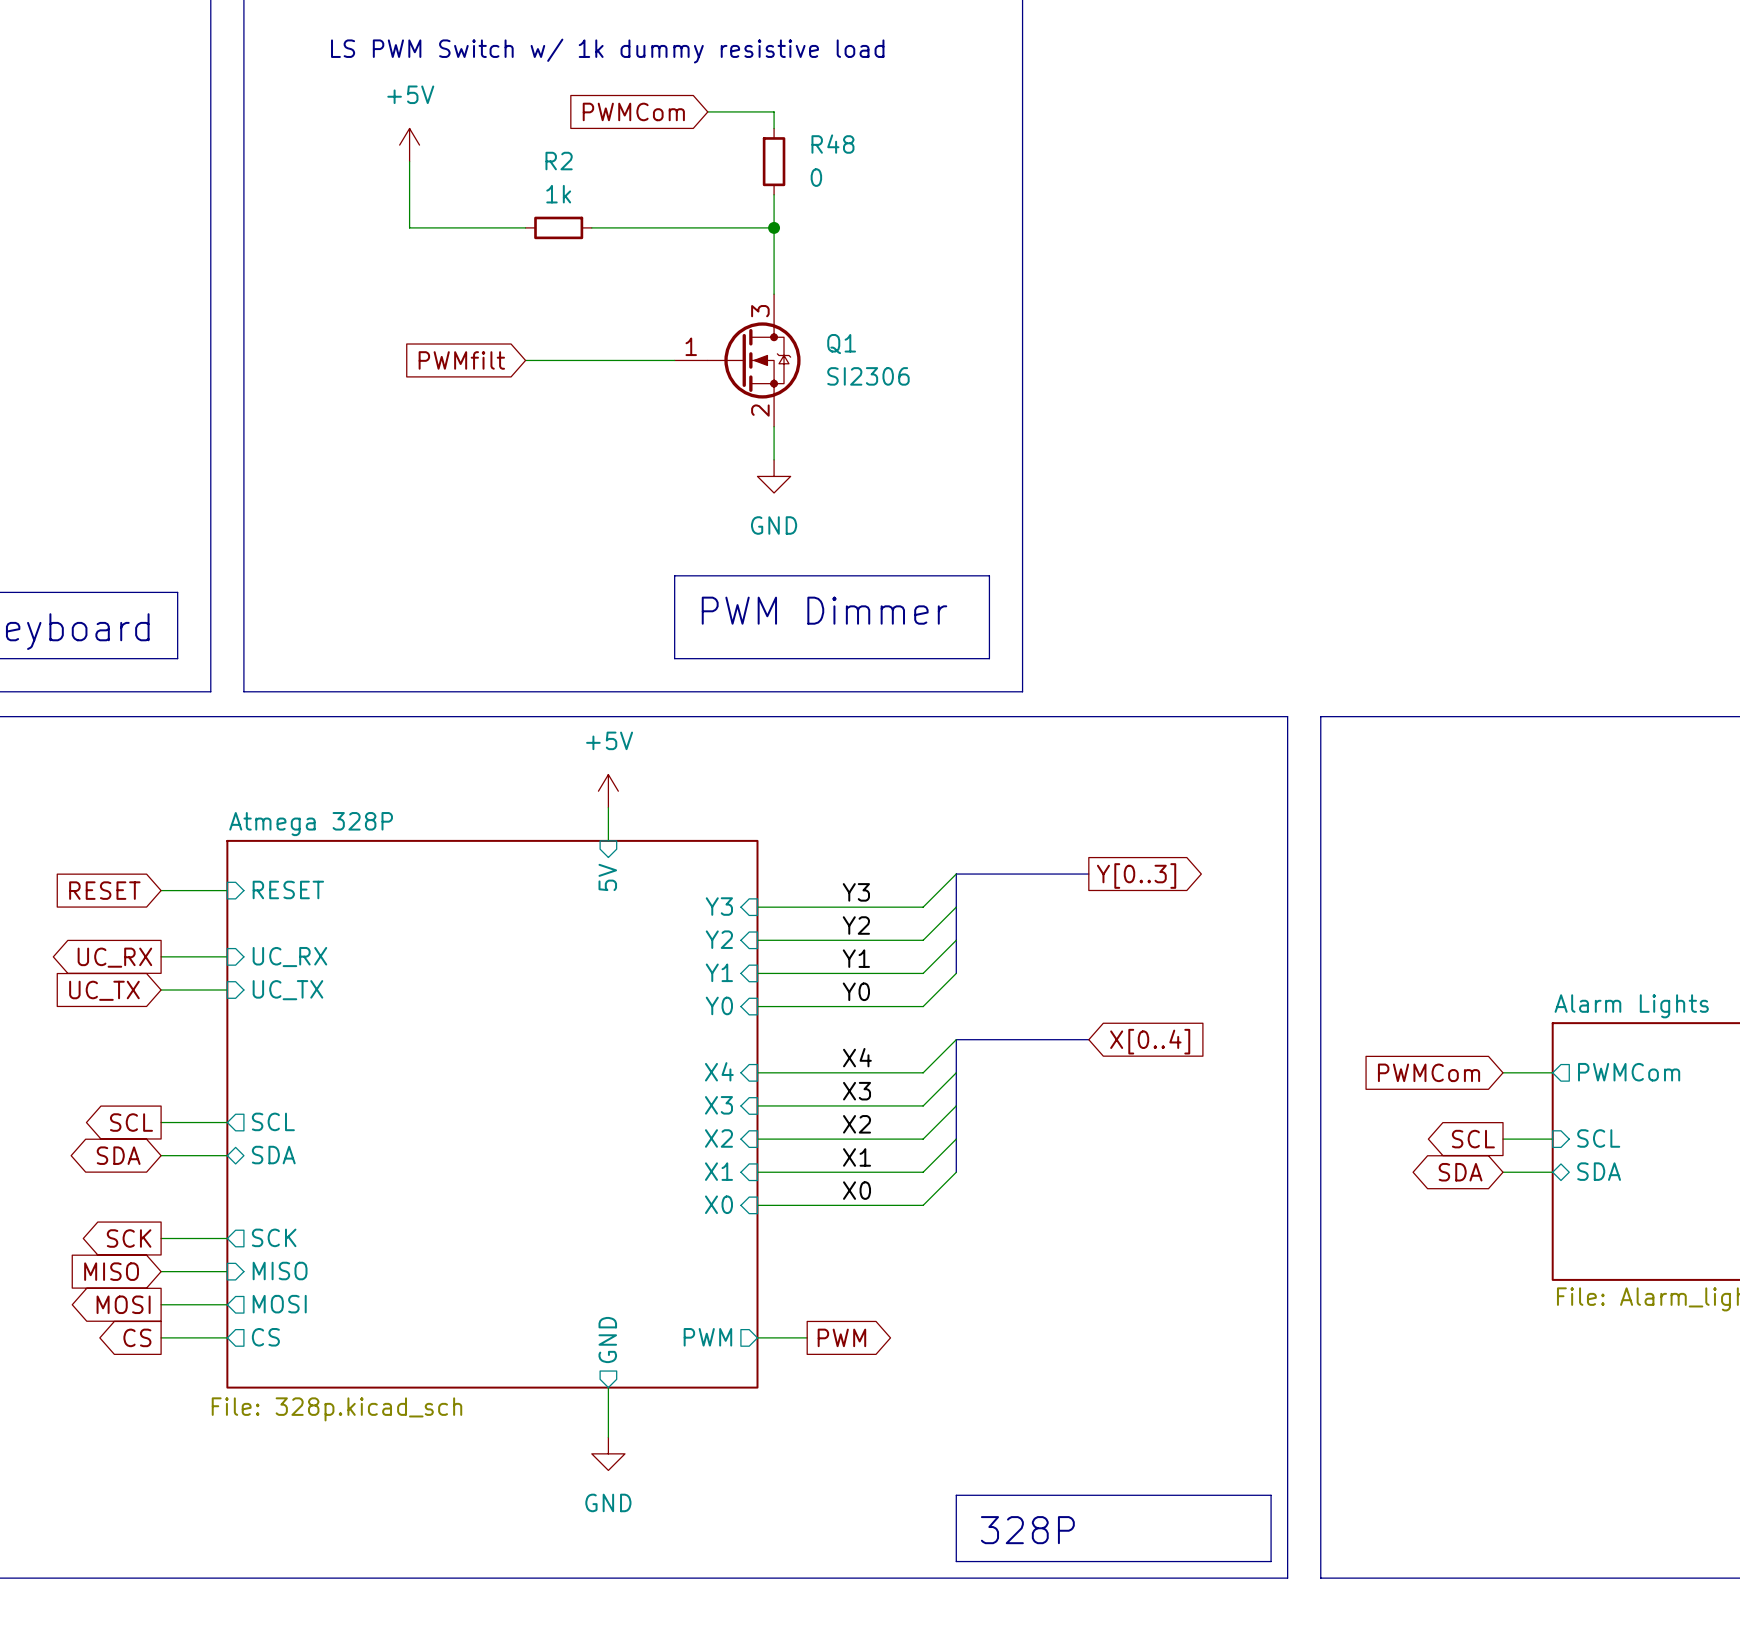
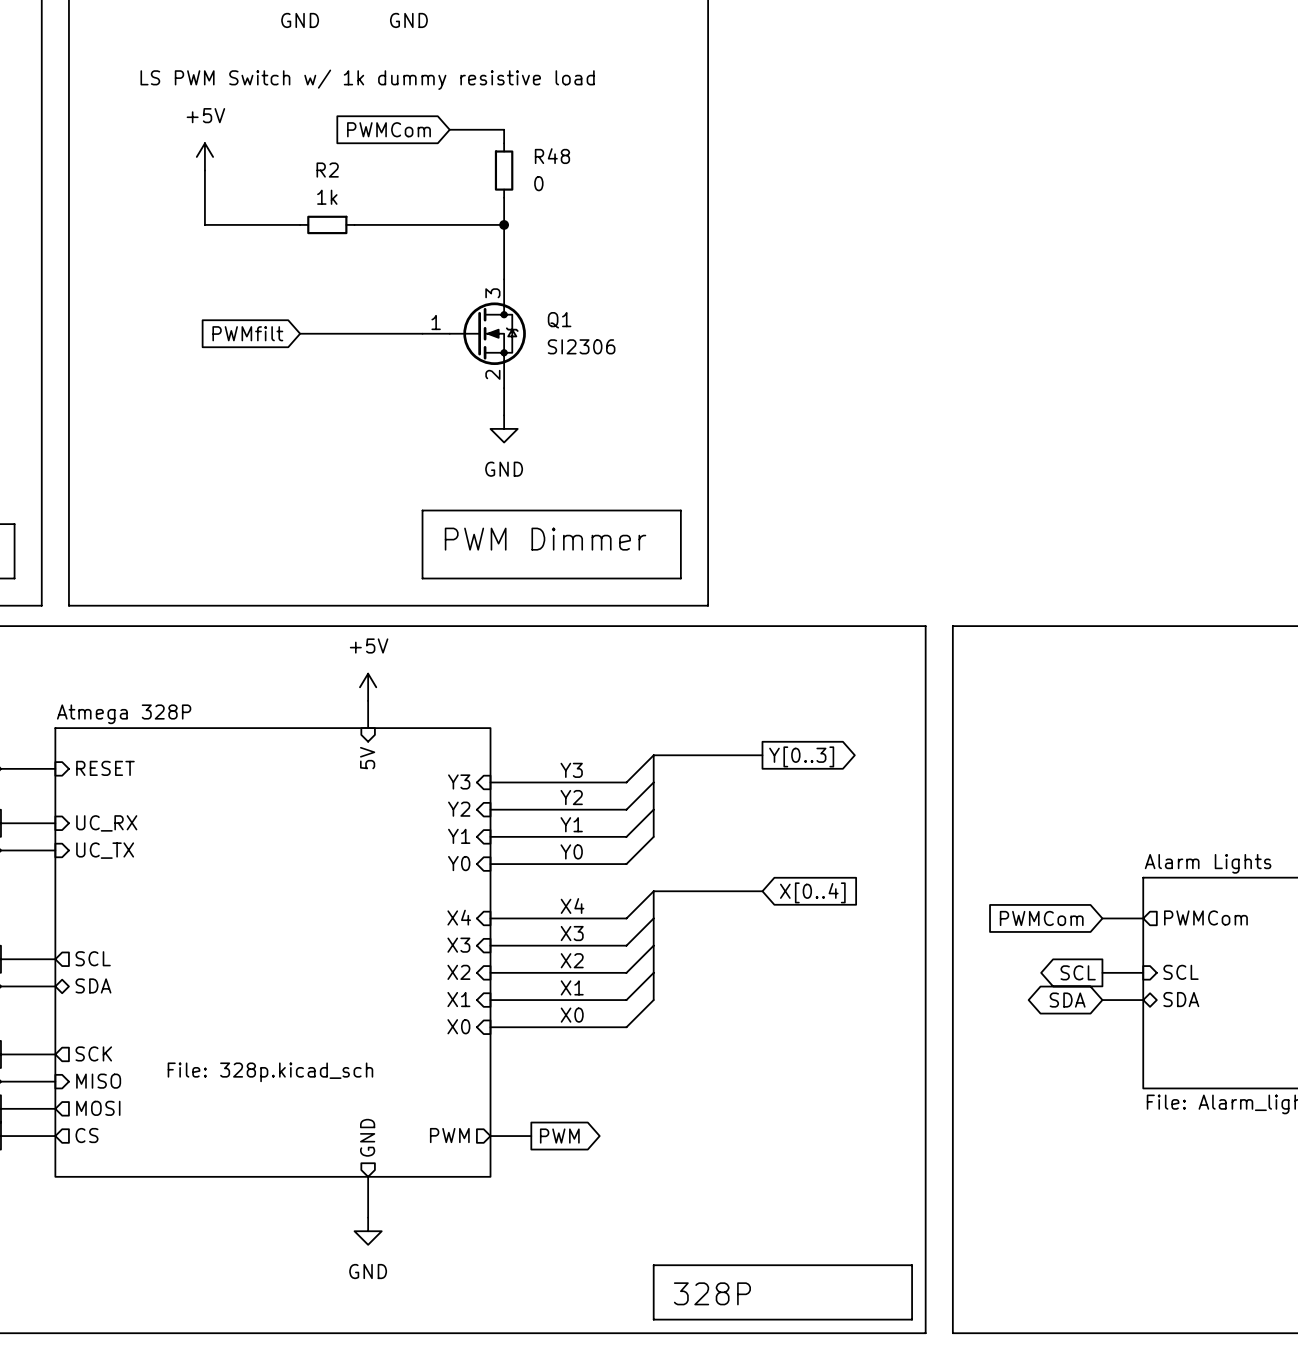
sheet Atmega 328P value position: File: 328p.kicad_sch (336, 1409) -> File: 328p.kicad_sch (270, 1072)

